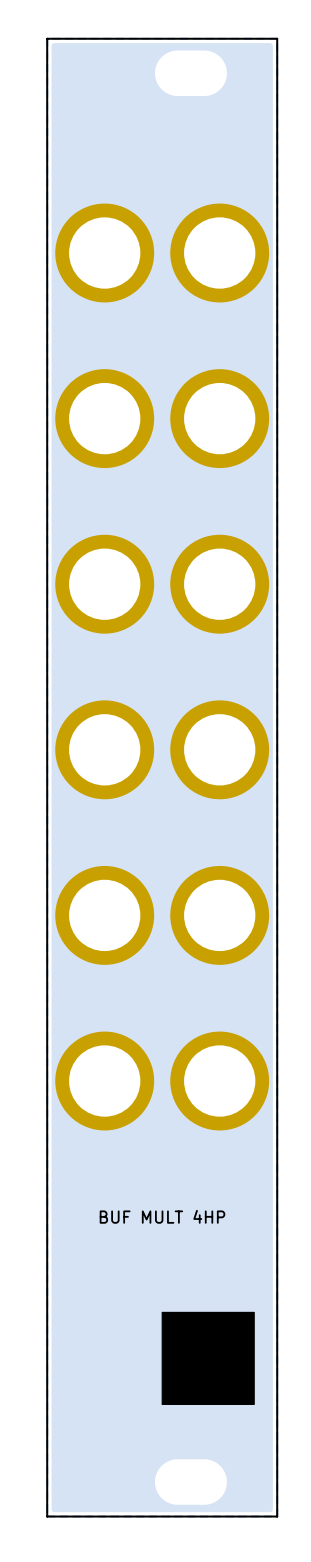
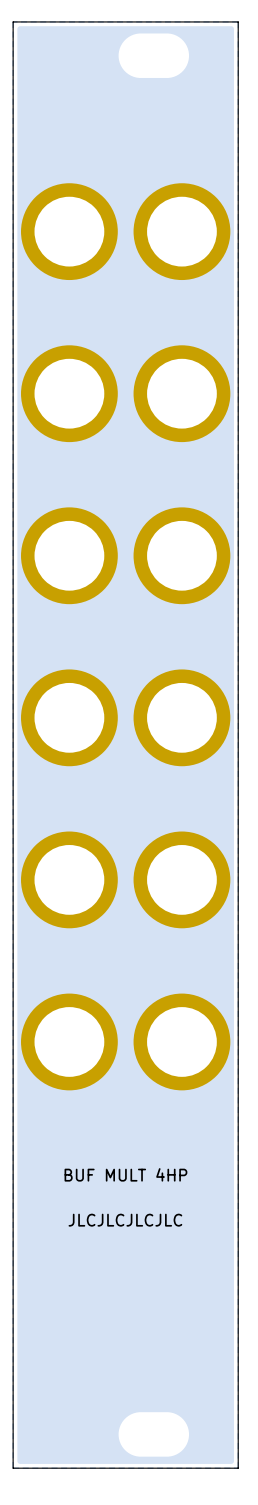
text: none -> JLCJLCJLCJLC (125, 1220)
drawing: [161, 1311, 255, 1405] -> none

